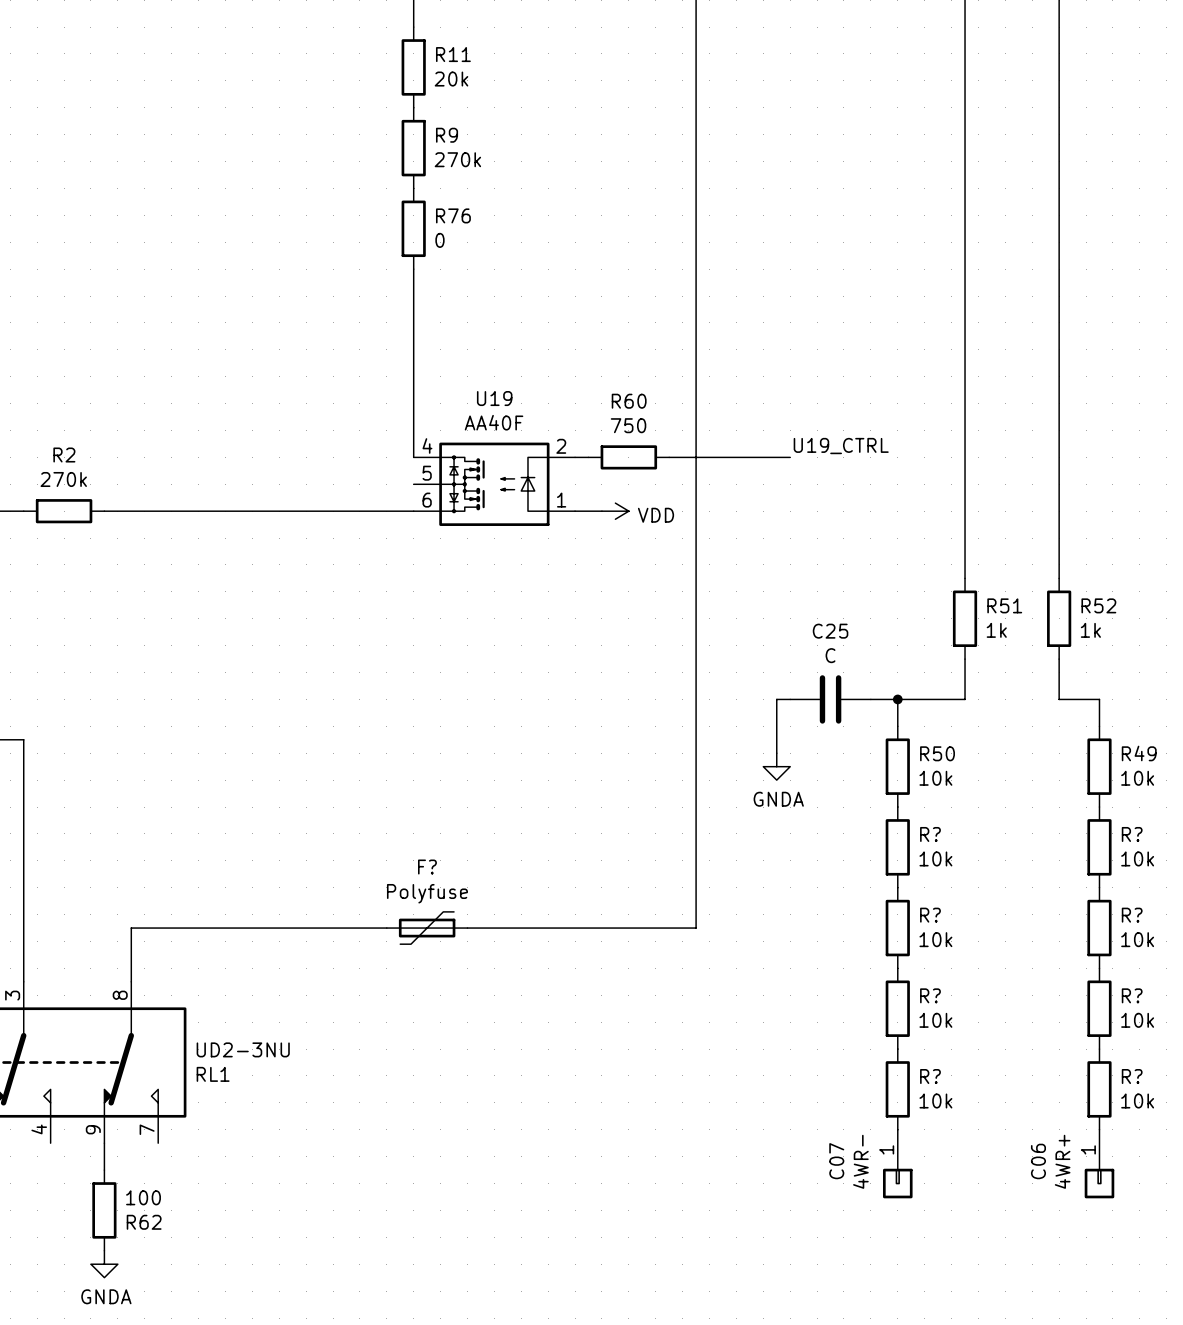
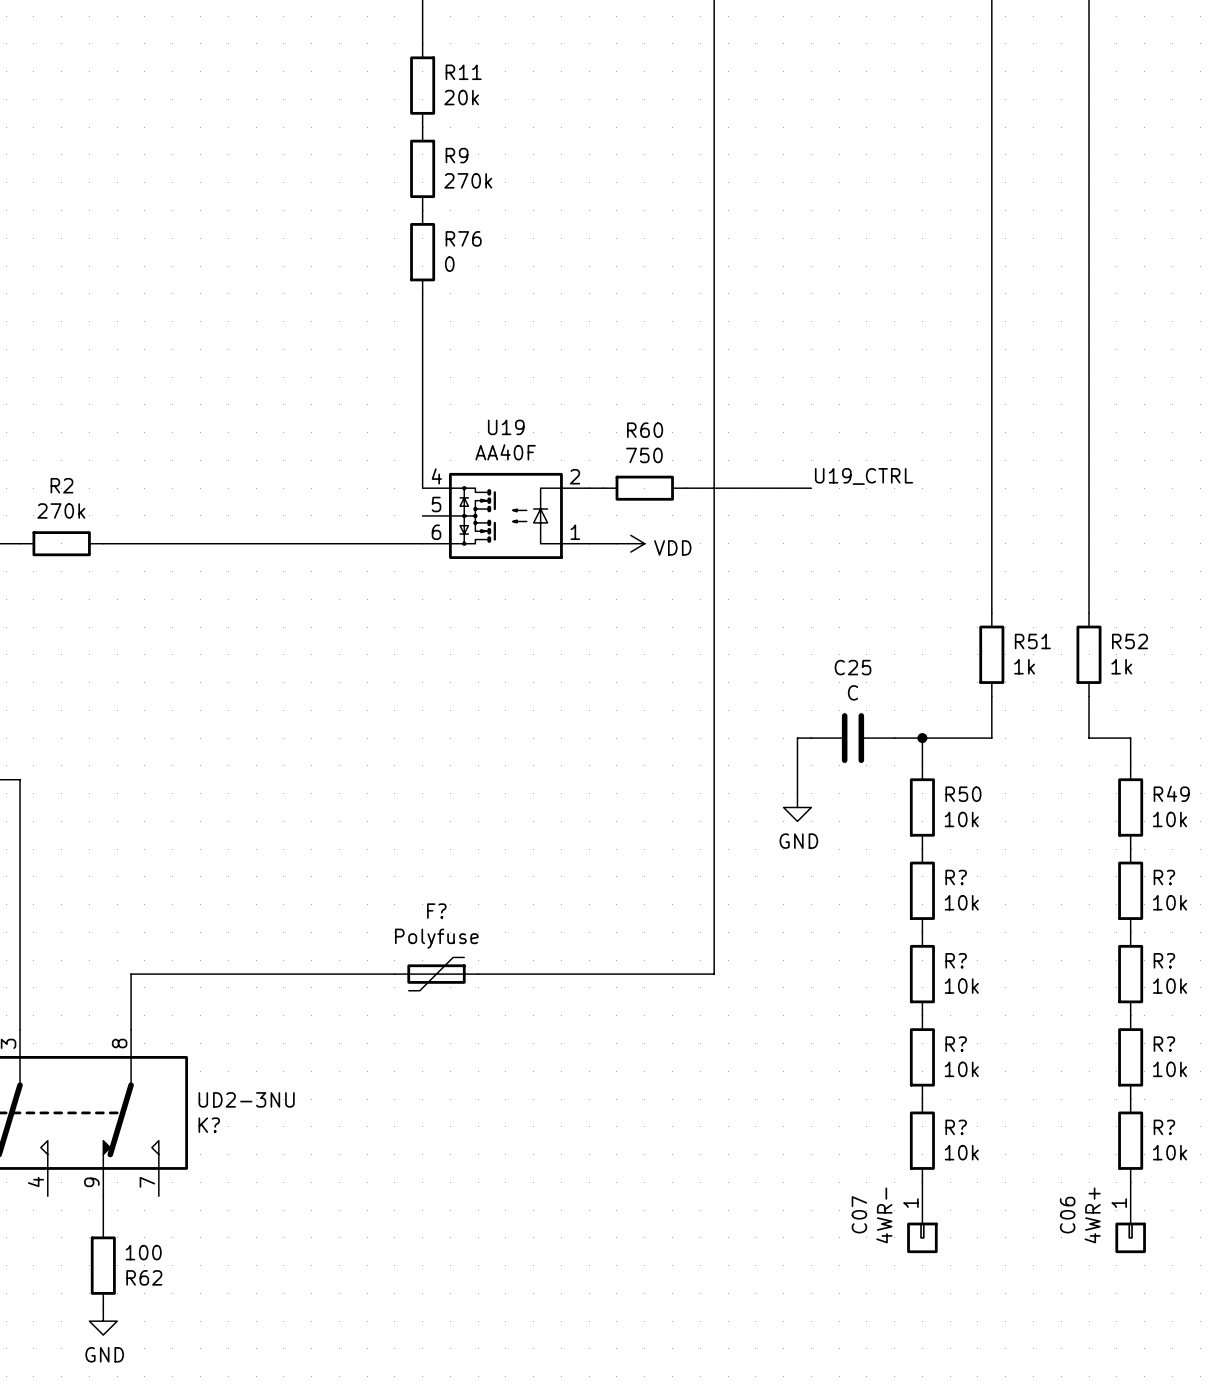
power symbol: GNDA (776, 766) -> GND (797, 807)
RL1 name: RL1 (213, 1074) -> K? (209, 1125)
power symbol: GNDA (104, 1264) -> GND (103, 1321)

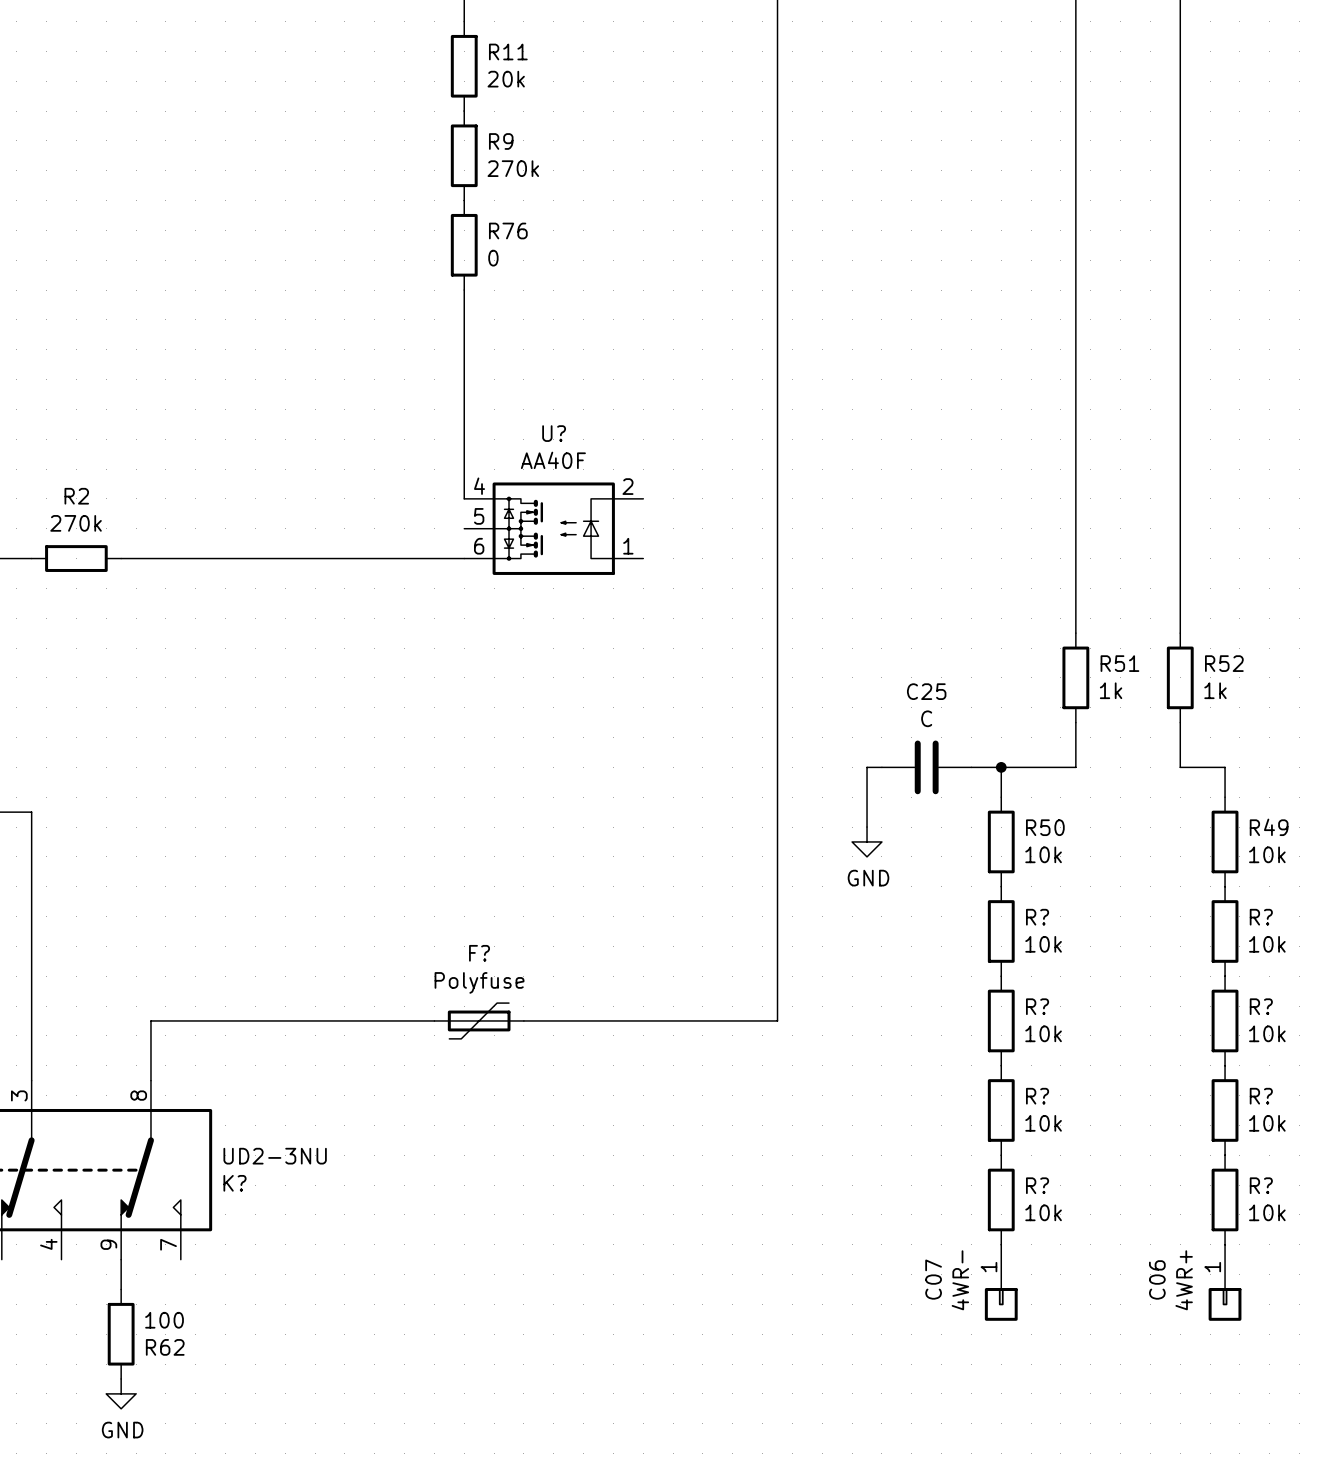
U19 name: U19 (506, 427) -> U? (554, 433)
label: U19_CTRL (864, 476) -> none
wire: (589, 488) (603, 488) -> none
R60: 750 (644, 488) -> none
wire: (686, 488) (811, 488) -> none
wire: (589, 543) (616, 543) -> none
power symbol: VDD (630, 543) -> none

